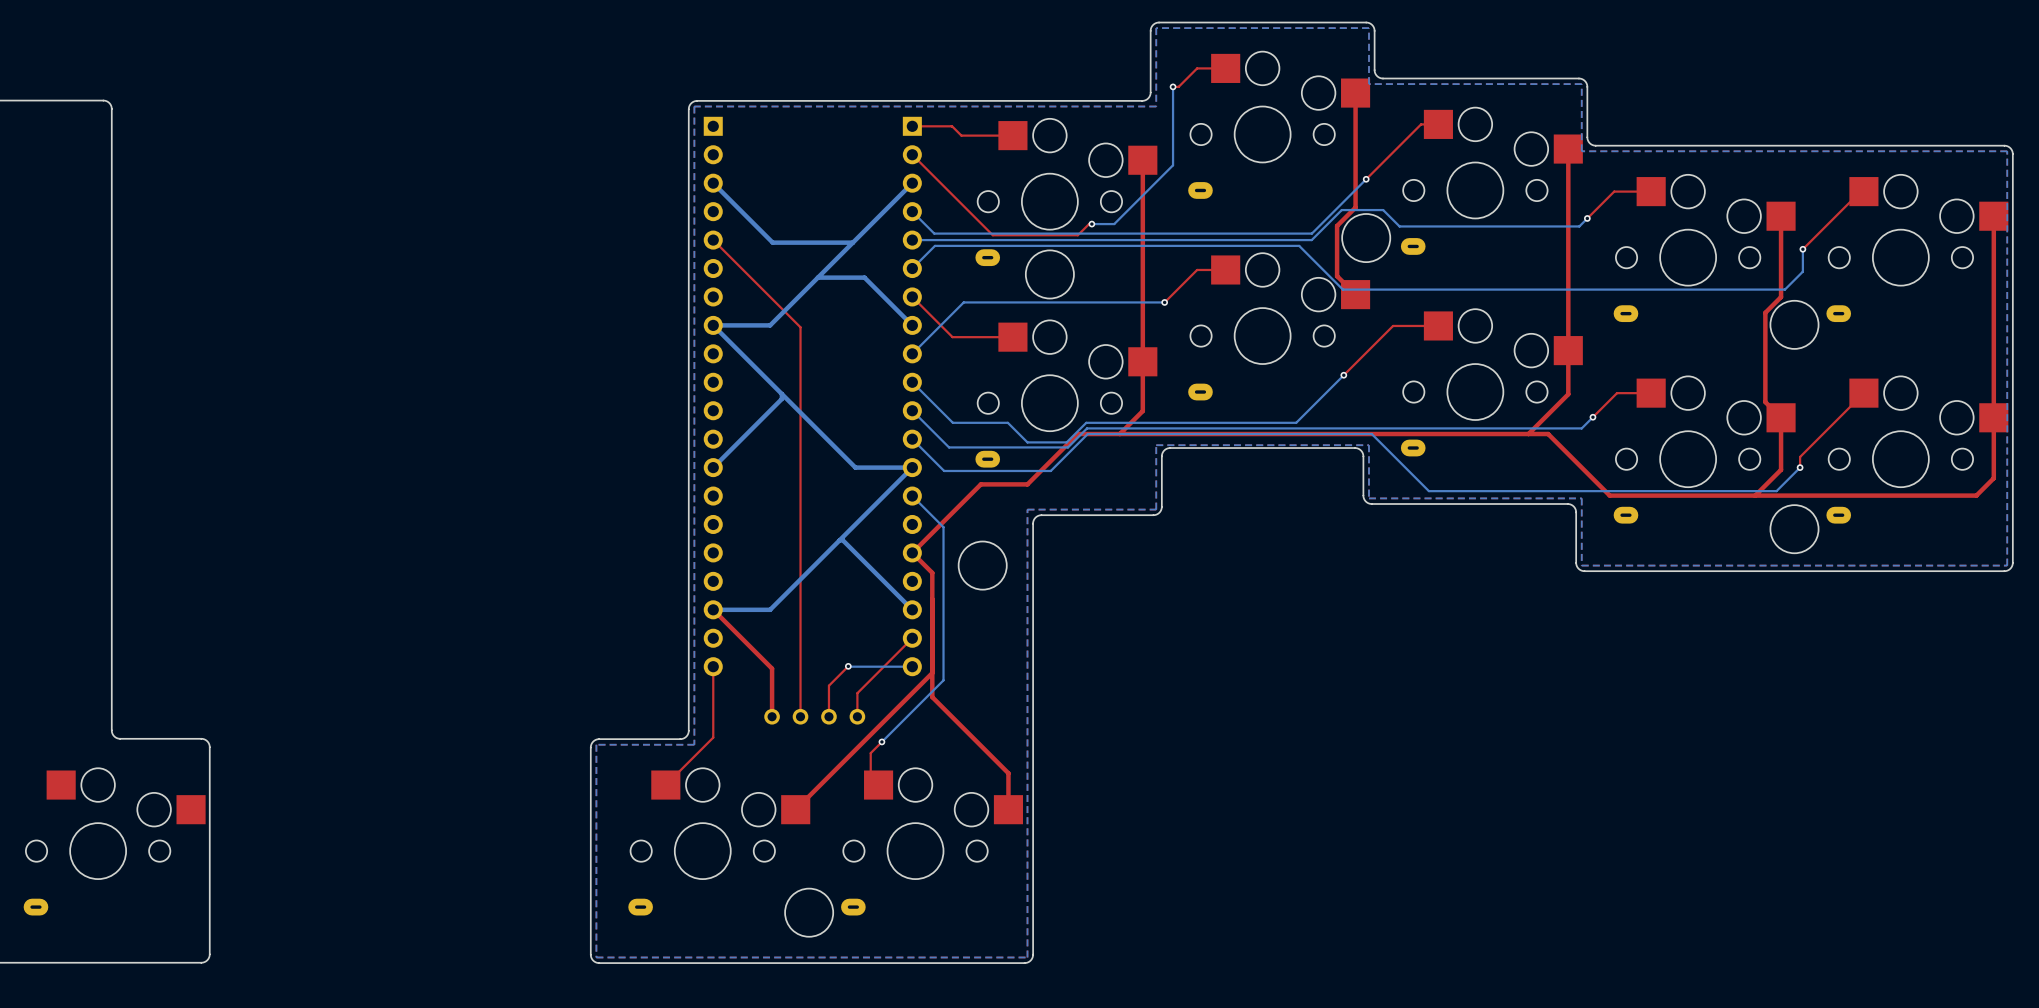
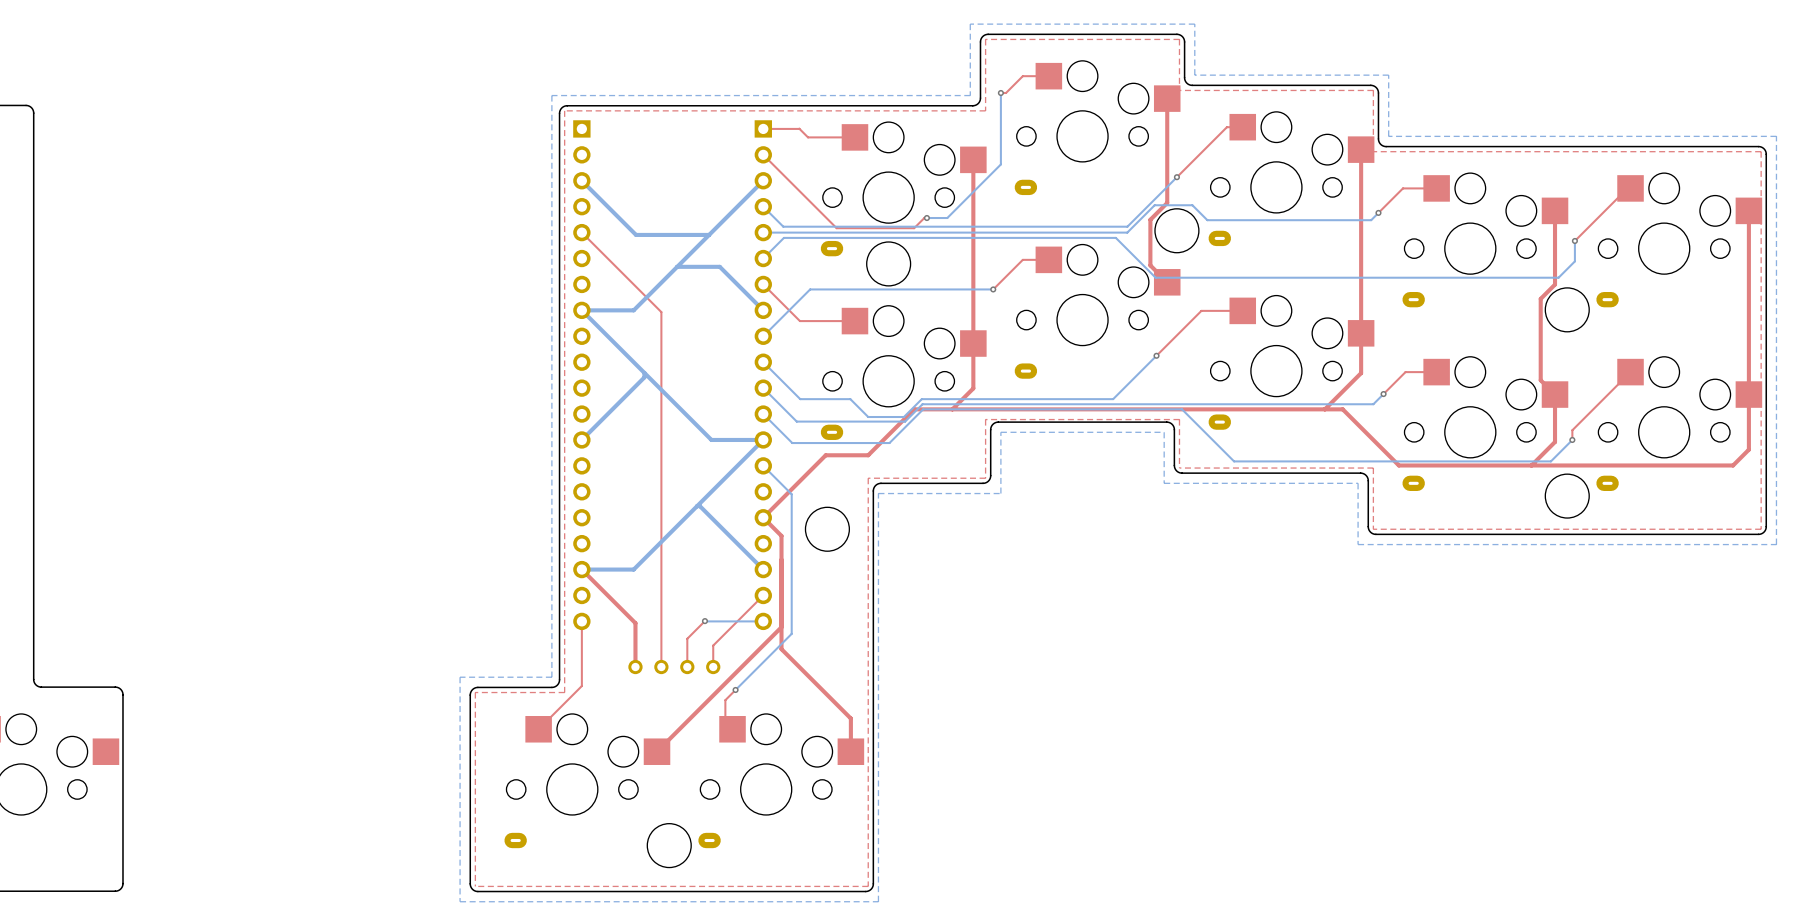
bottom zone outline: (1369, 28) (1369, 84) (1581, 84) (1581, 151) (2007, 151) (2007, 565) (1581, 565) (1581, 498) (1369, 498) (1369, 445) (1156, 445) (1156, 509) (1027, 509) (1027, 957) (596, 957) (596, 744) (694, 744) (694, 106) (1156, 106) (1156, 28) (1369, 28) -> (1194, 24) (1194, 75) (1388, 75) (1388, 136) (1776, 136) (1776, 544) (1358, 544) (1358, 483) (1164, 483) (1164, 432) (1000, 432) (1000, 493) (878, 493) (878, 901) (460, 901) (460, 677) (551, 677) (551, 95) (970, 95) (970, 24) (1194, 24)

